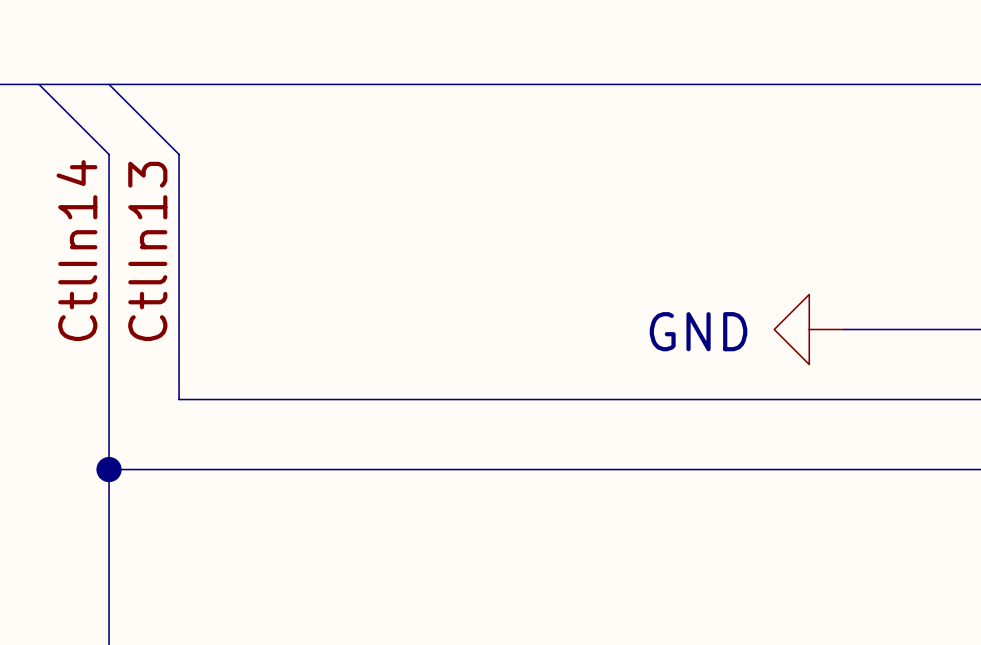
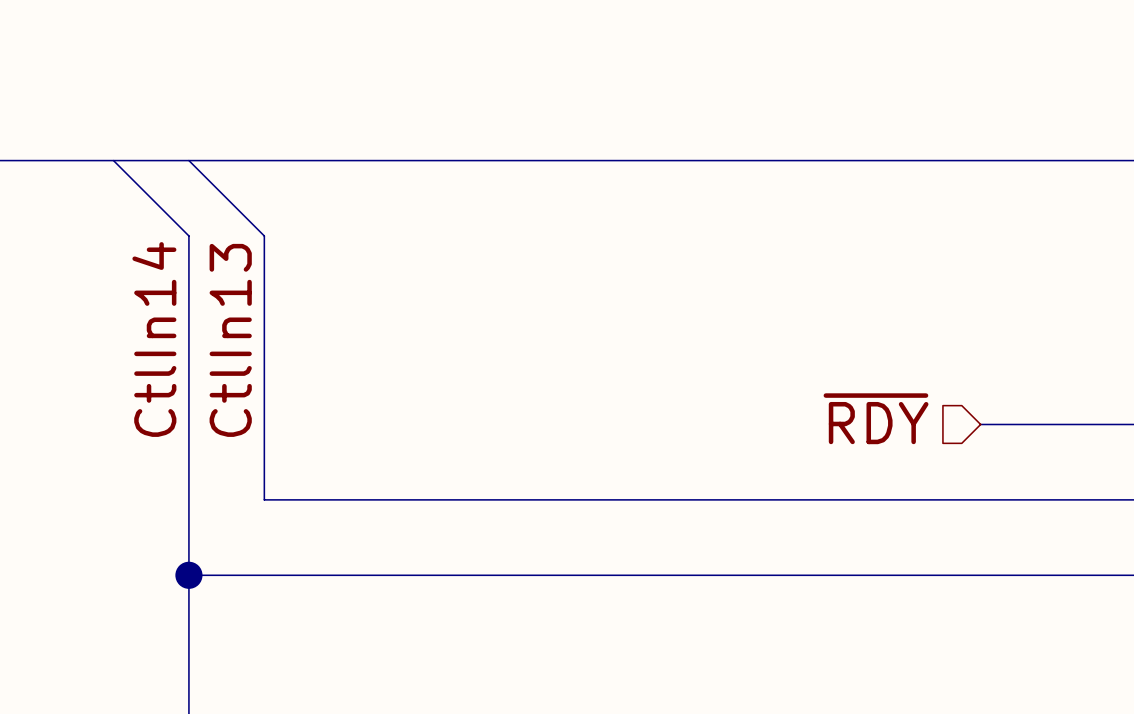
hierarchical label: none -> ~{RDY} (876, 418)
power symbol: GND (809, 329) -> none

